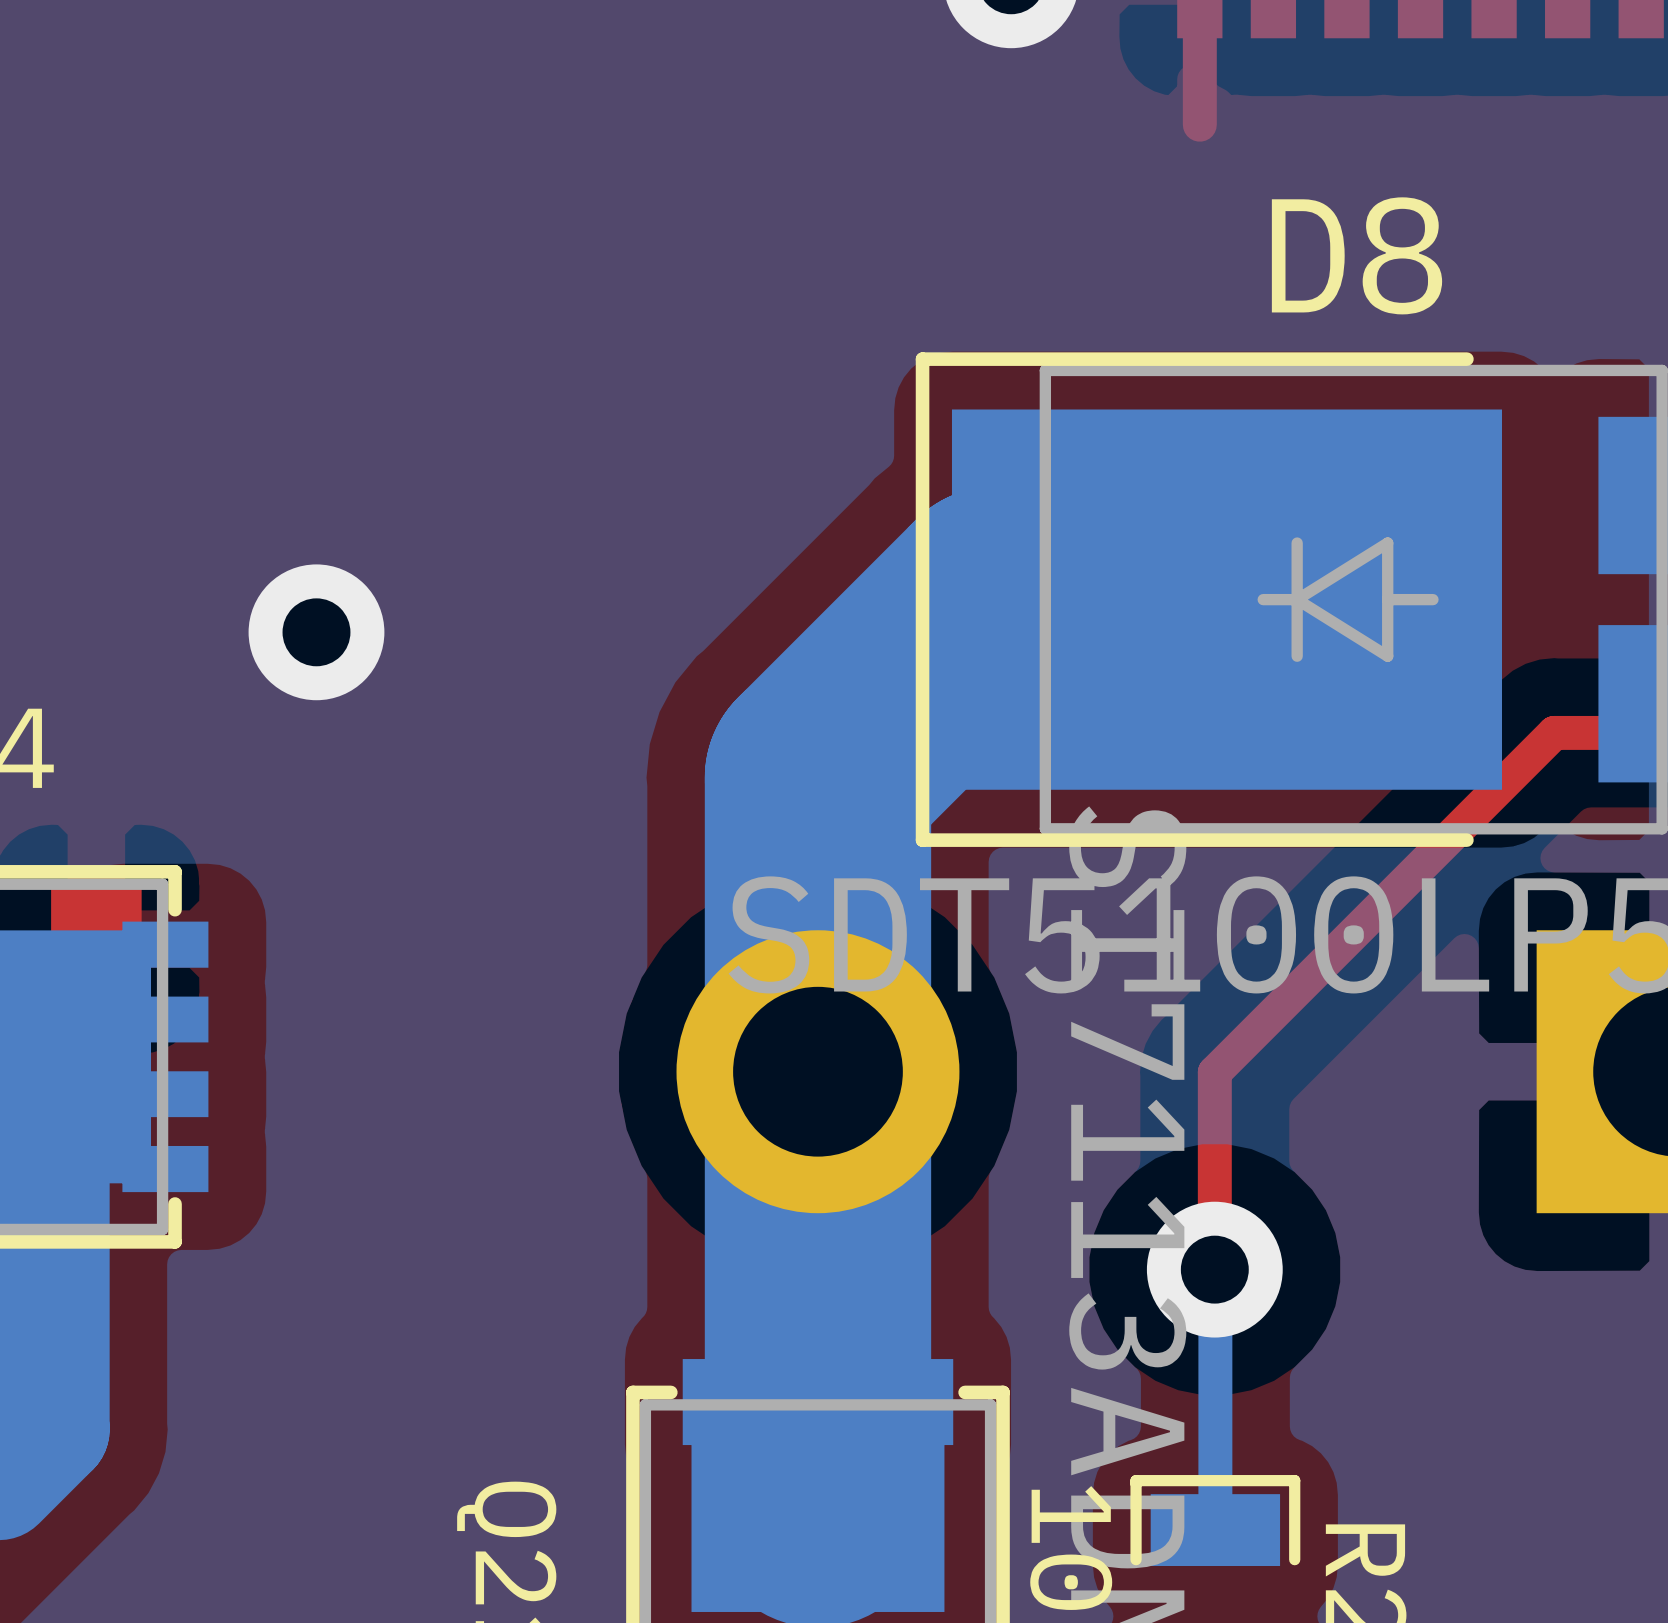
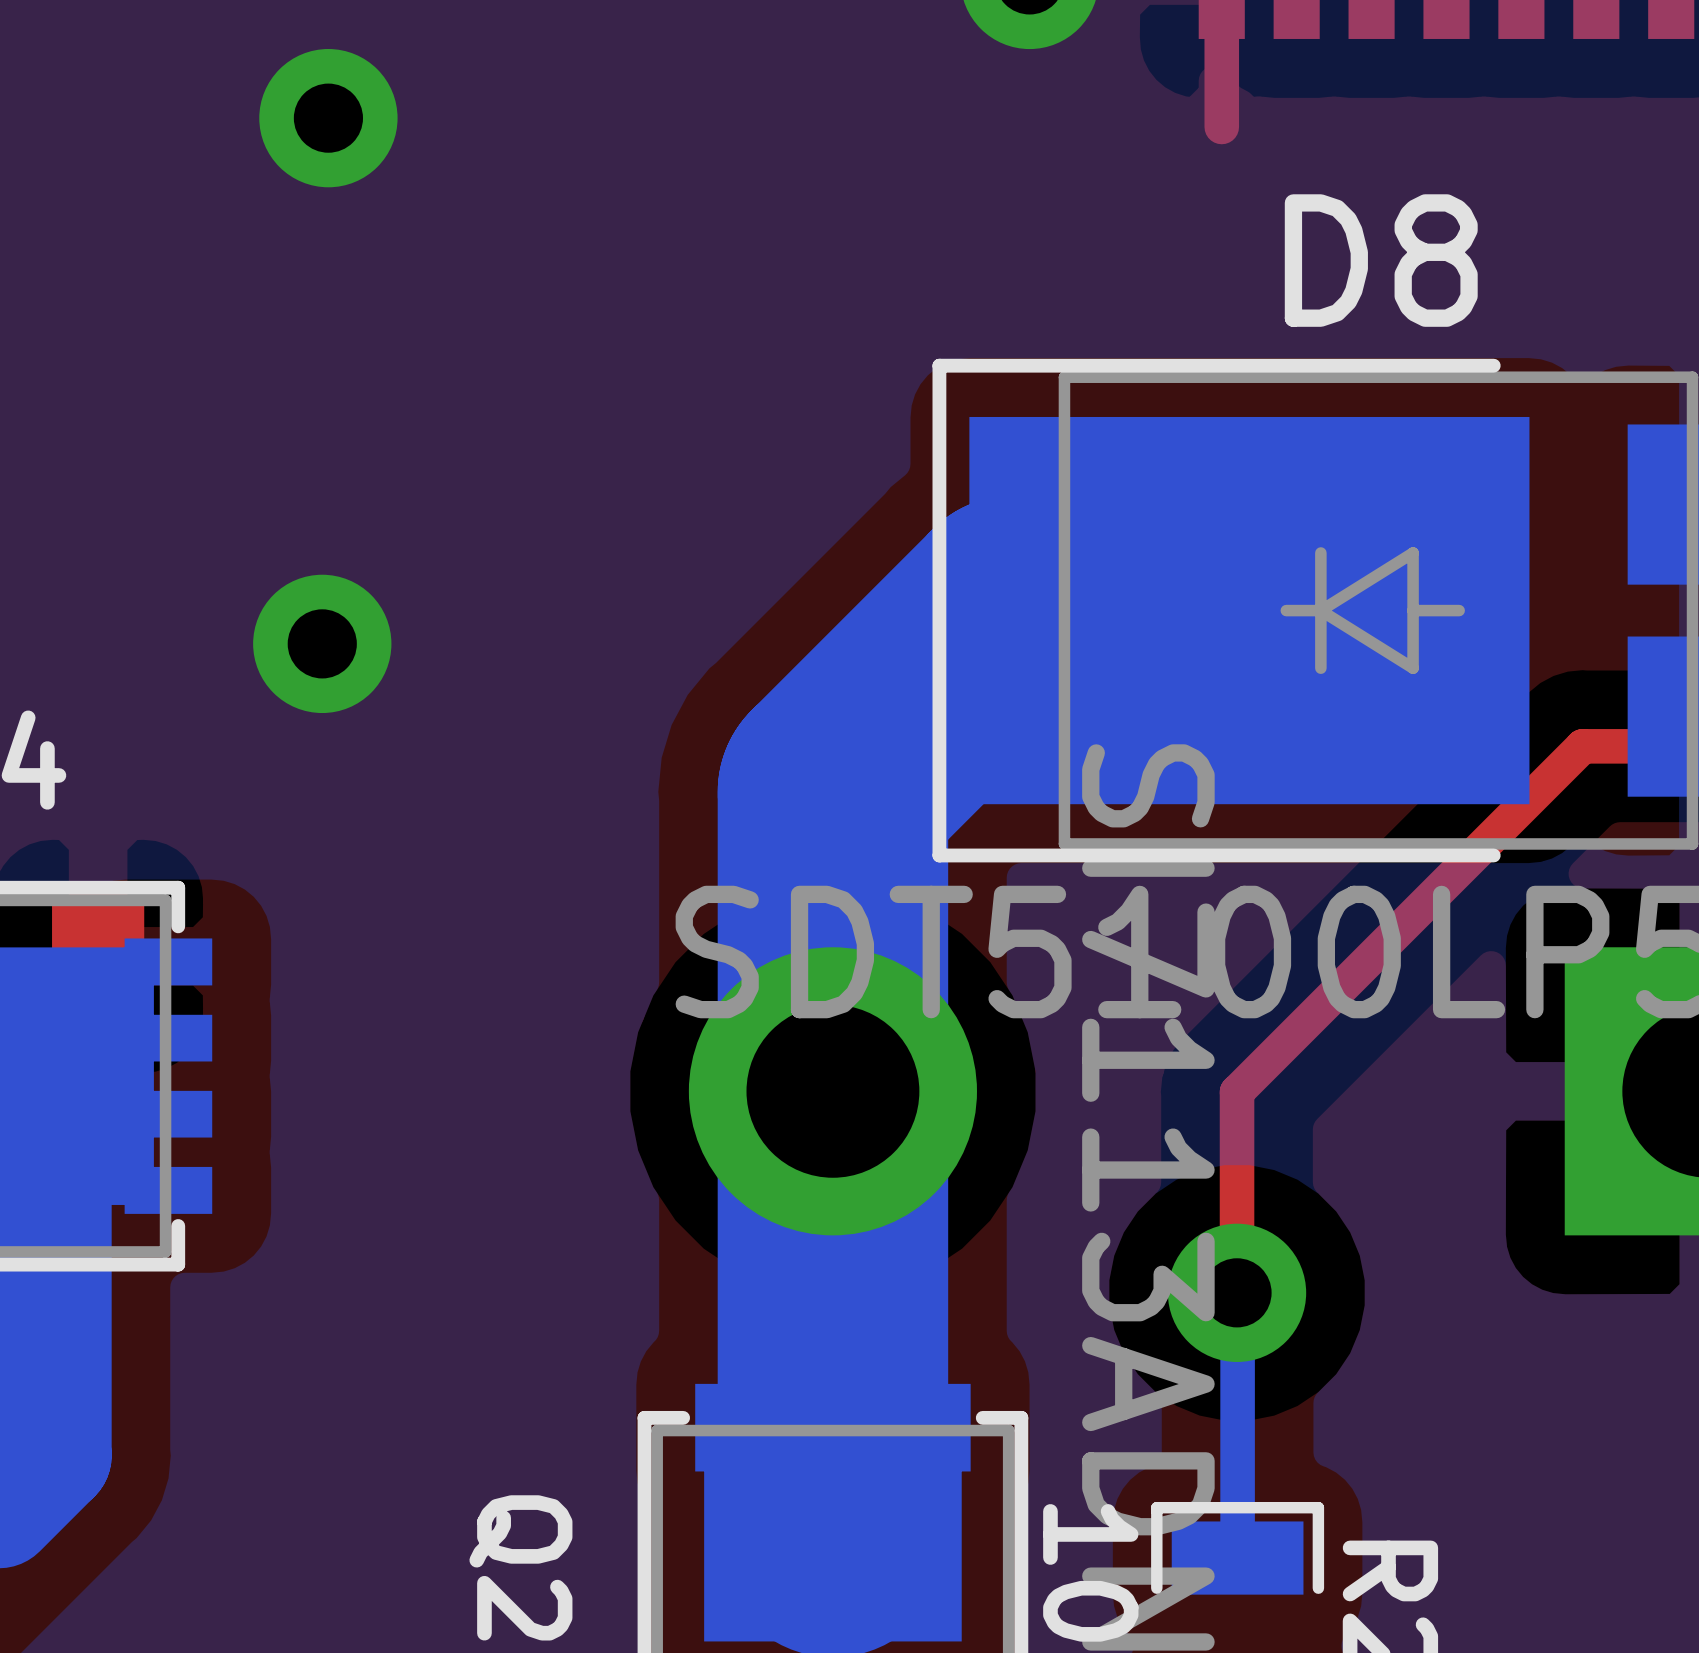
via: none -> (328, 118)

